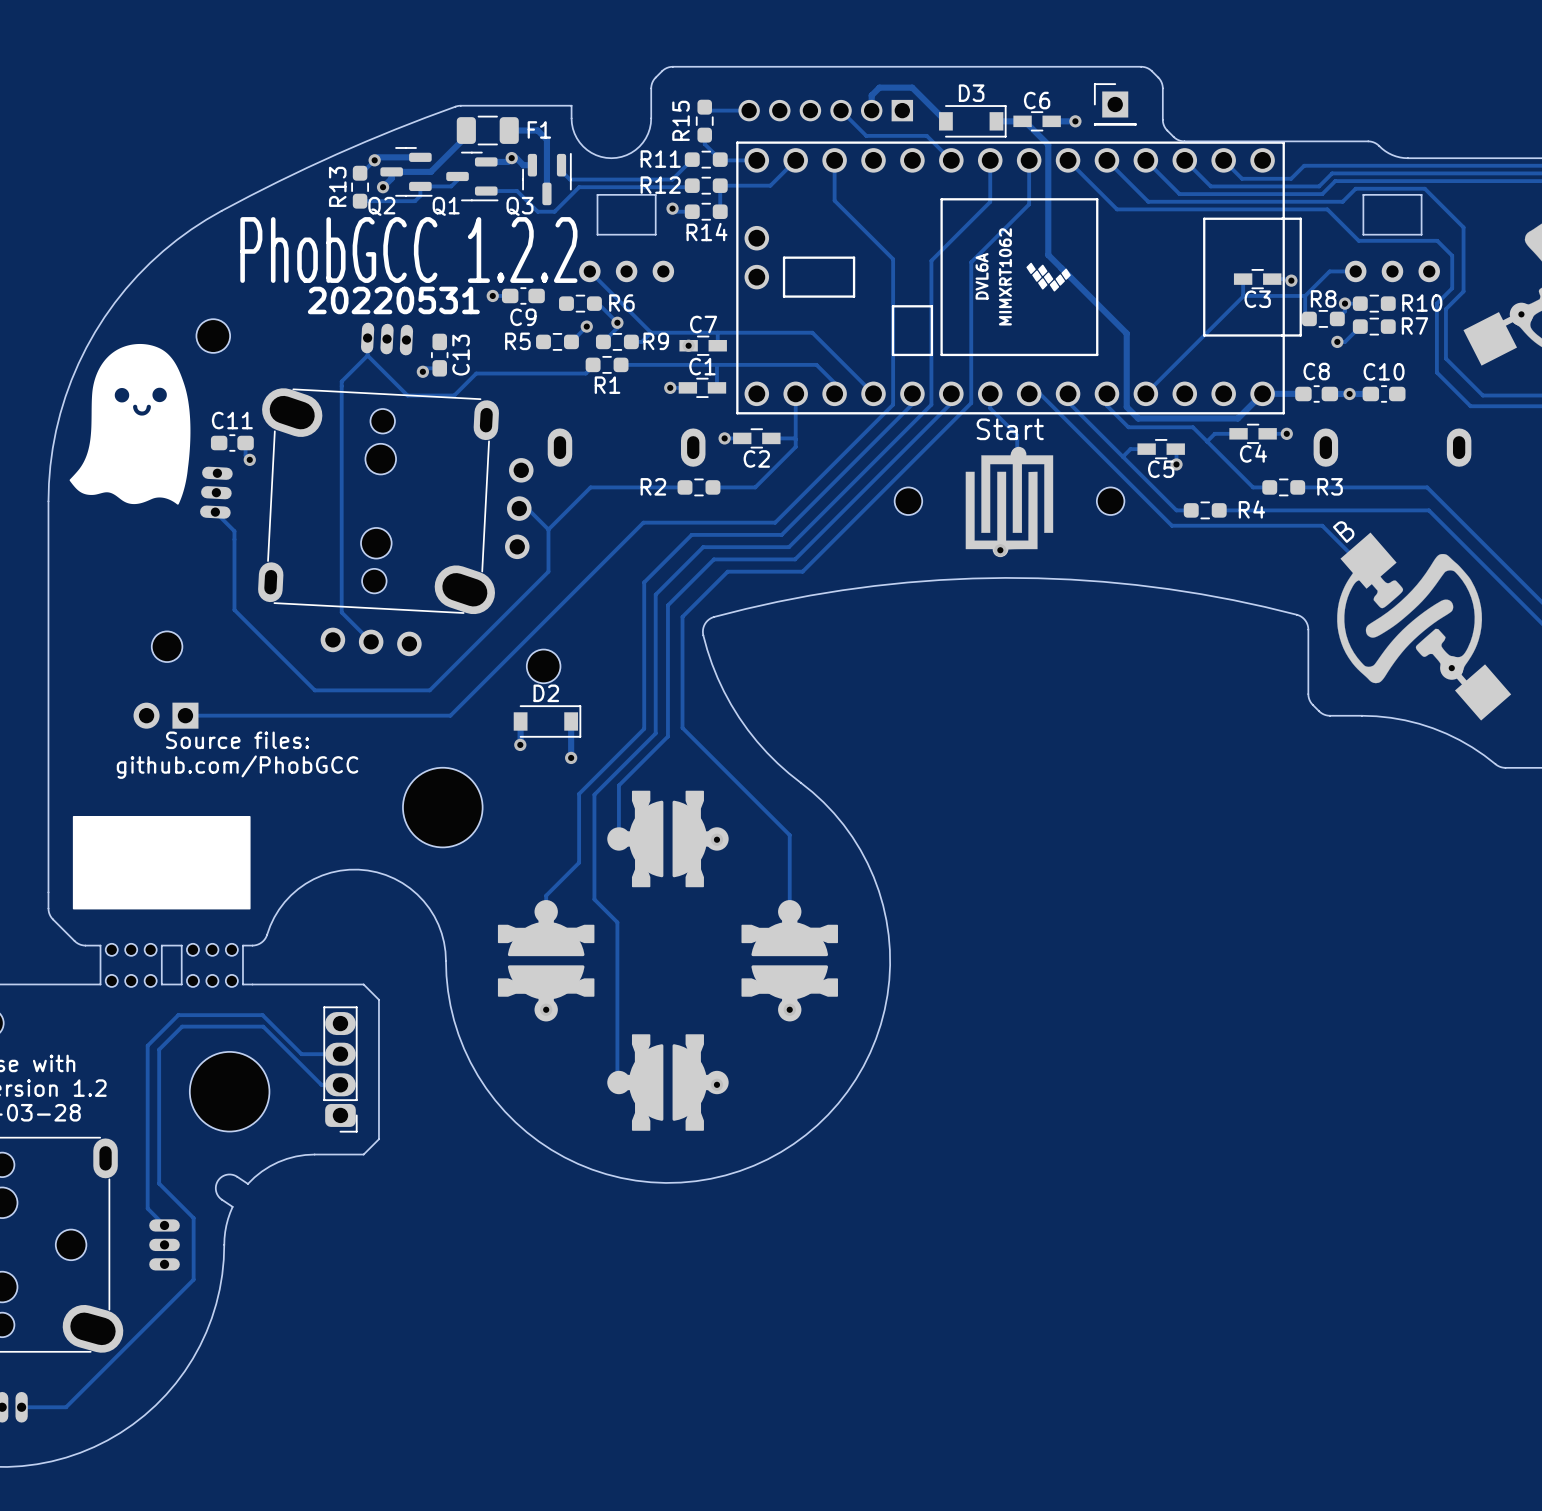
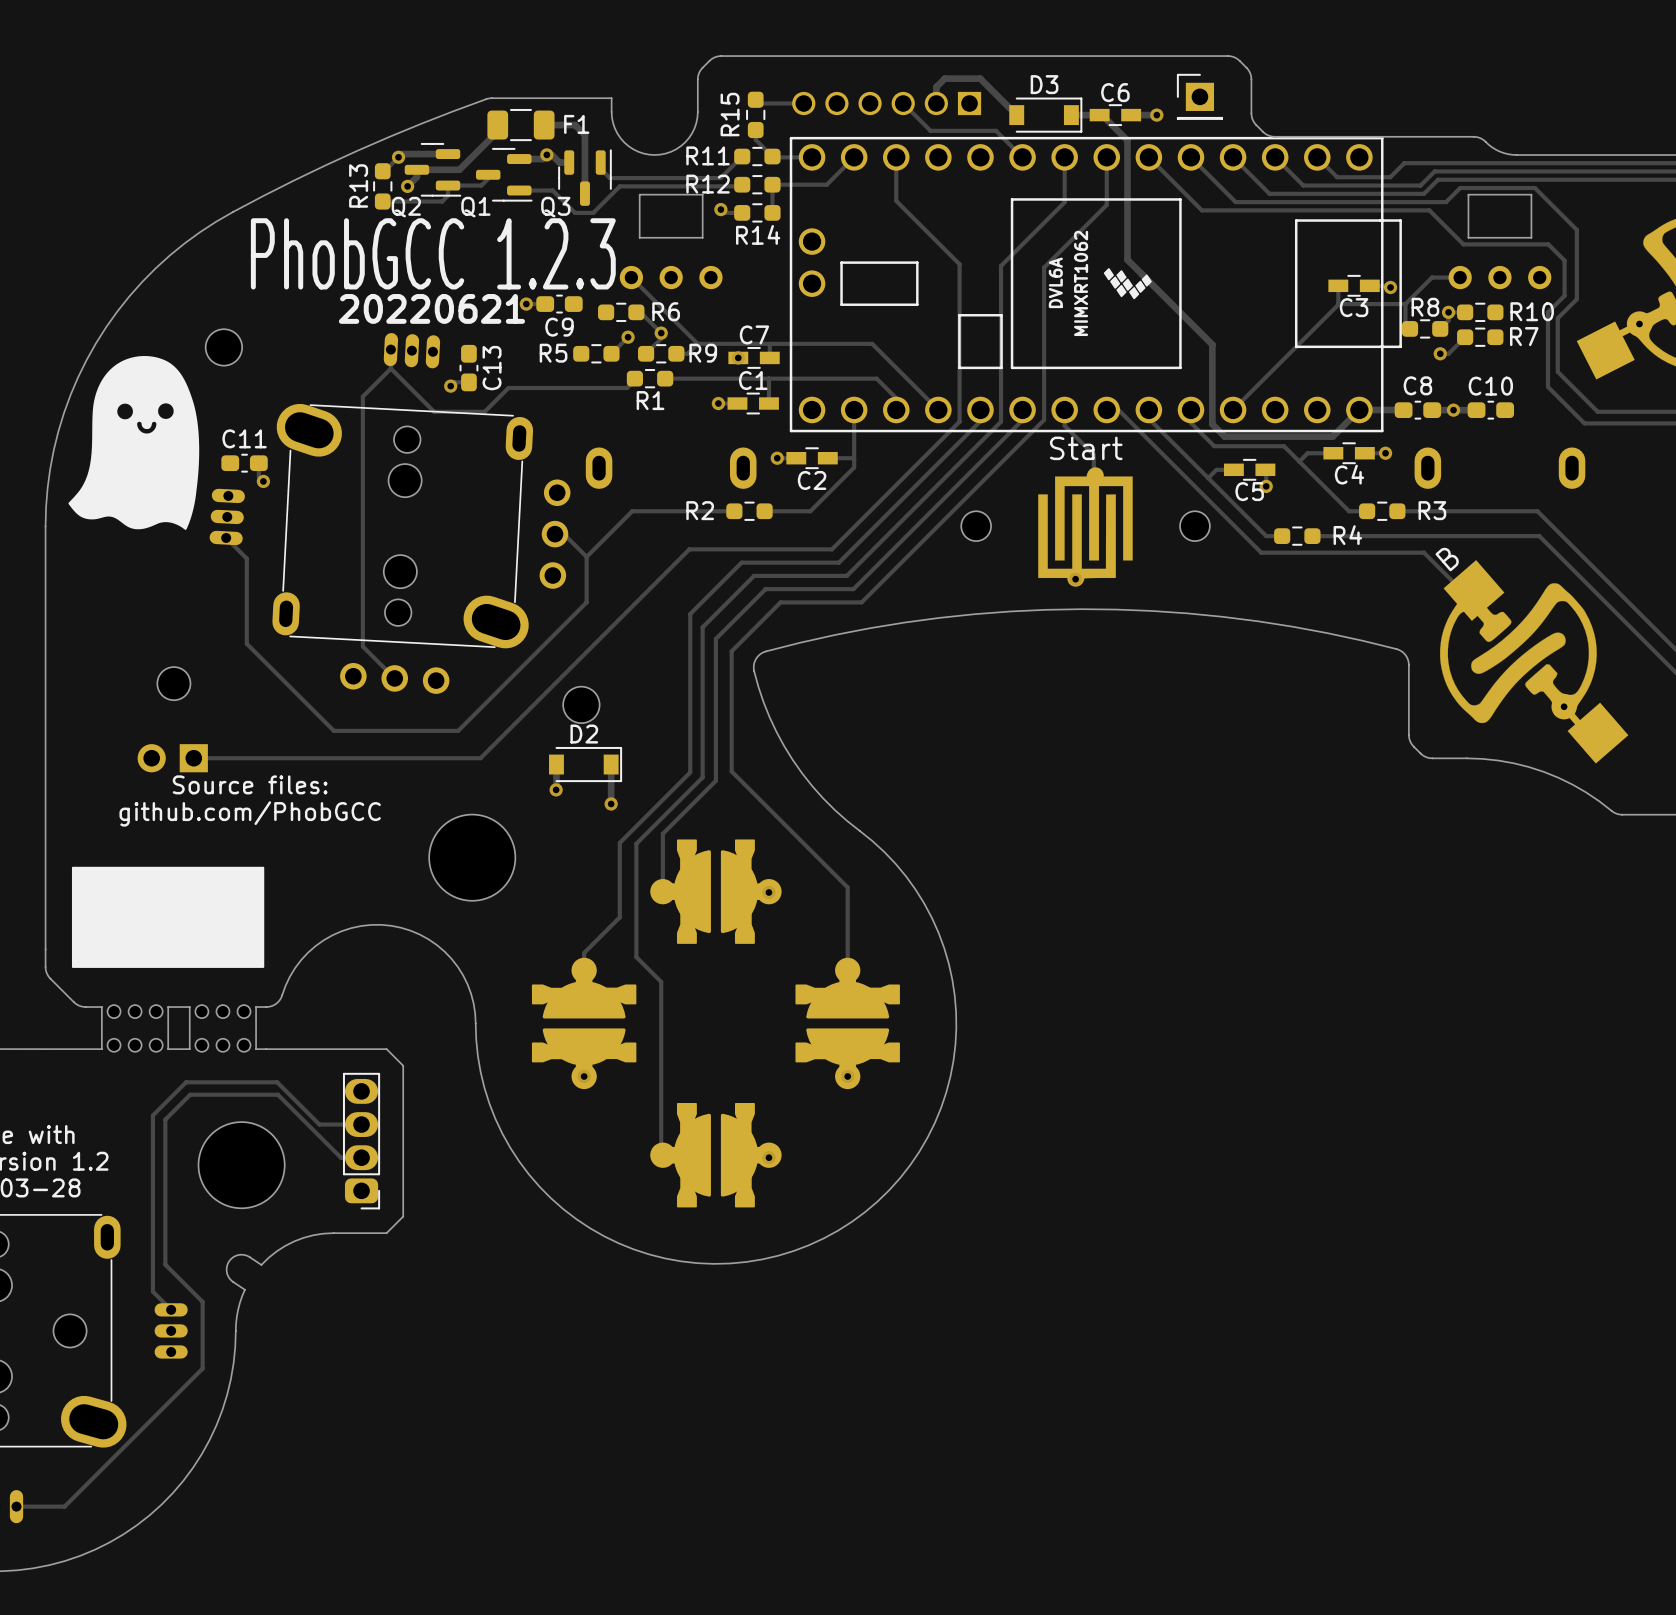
text: PhobGCC 1.2.2 (408, 250) -> PhobGCC 1.2.3 (433, 253)
text: 20220531 (393, 300) -> 20220621 (431, 308)

